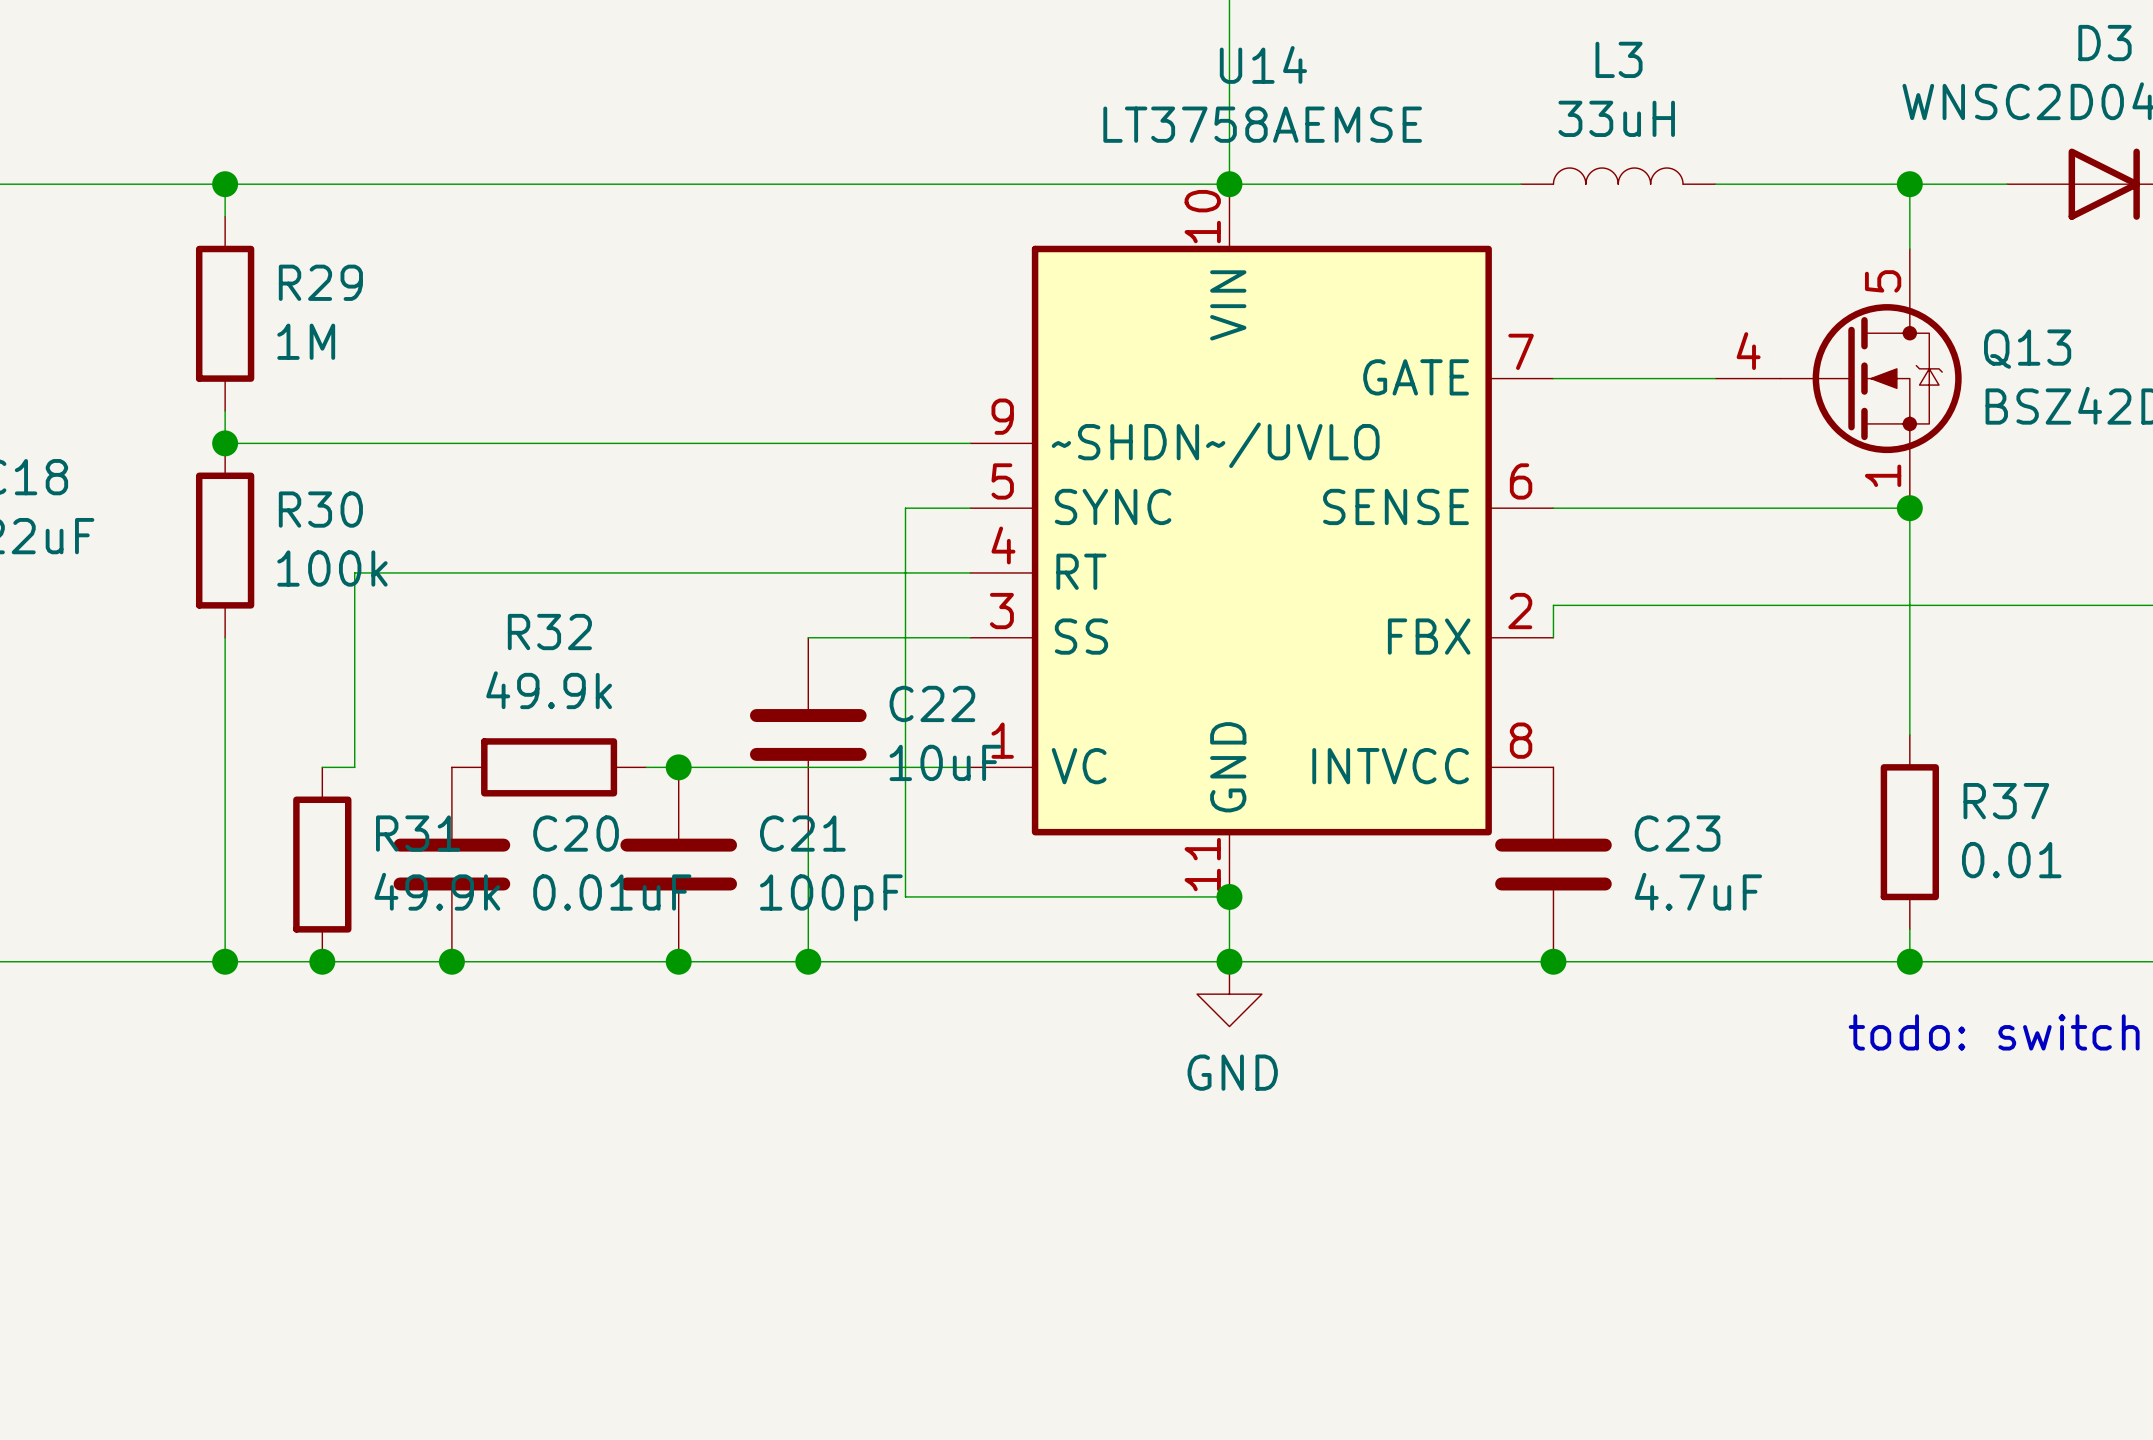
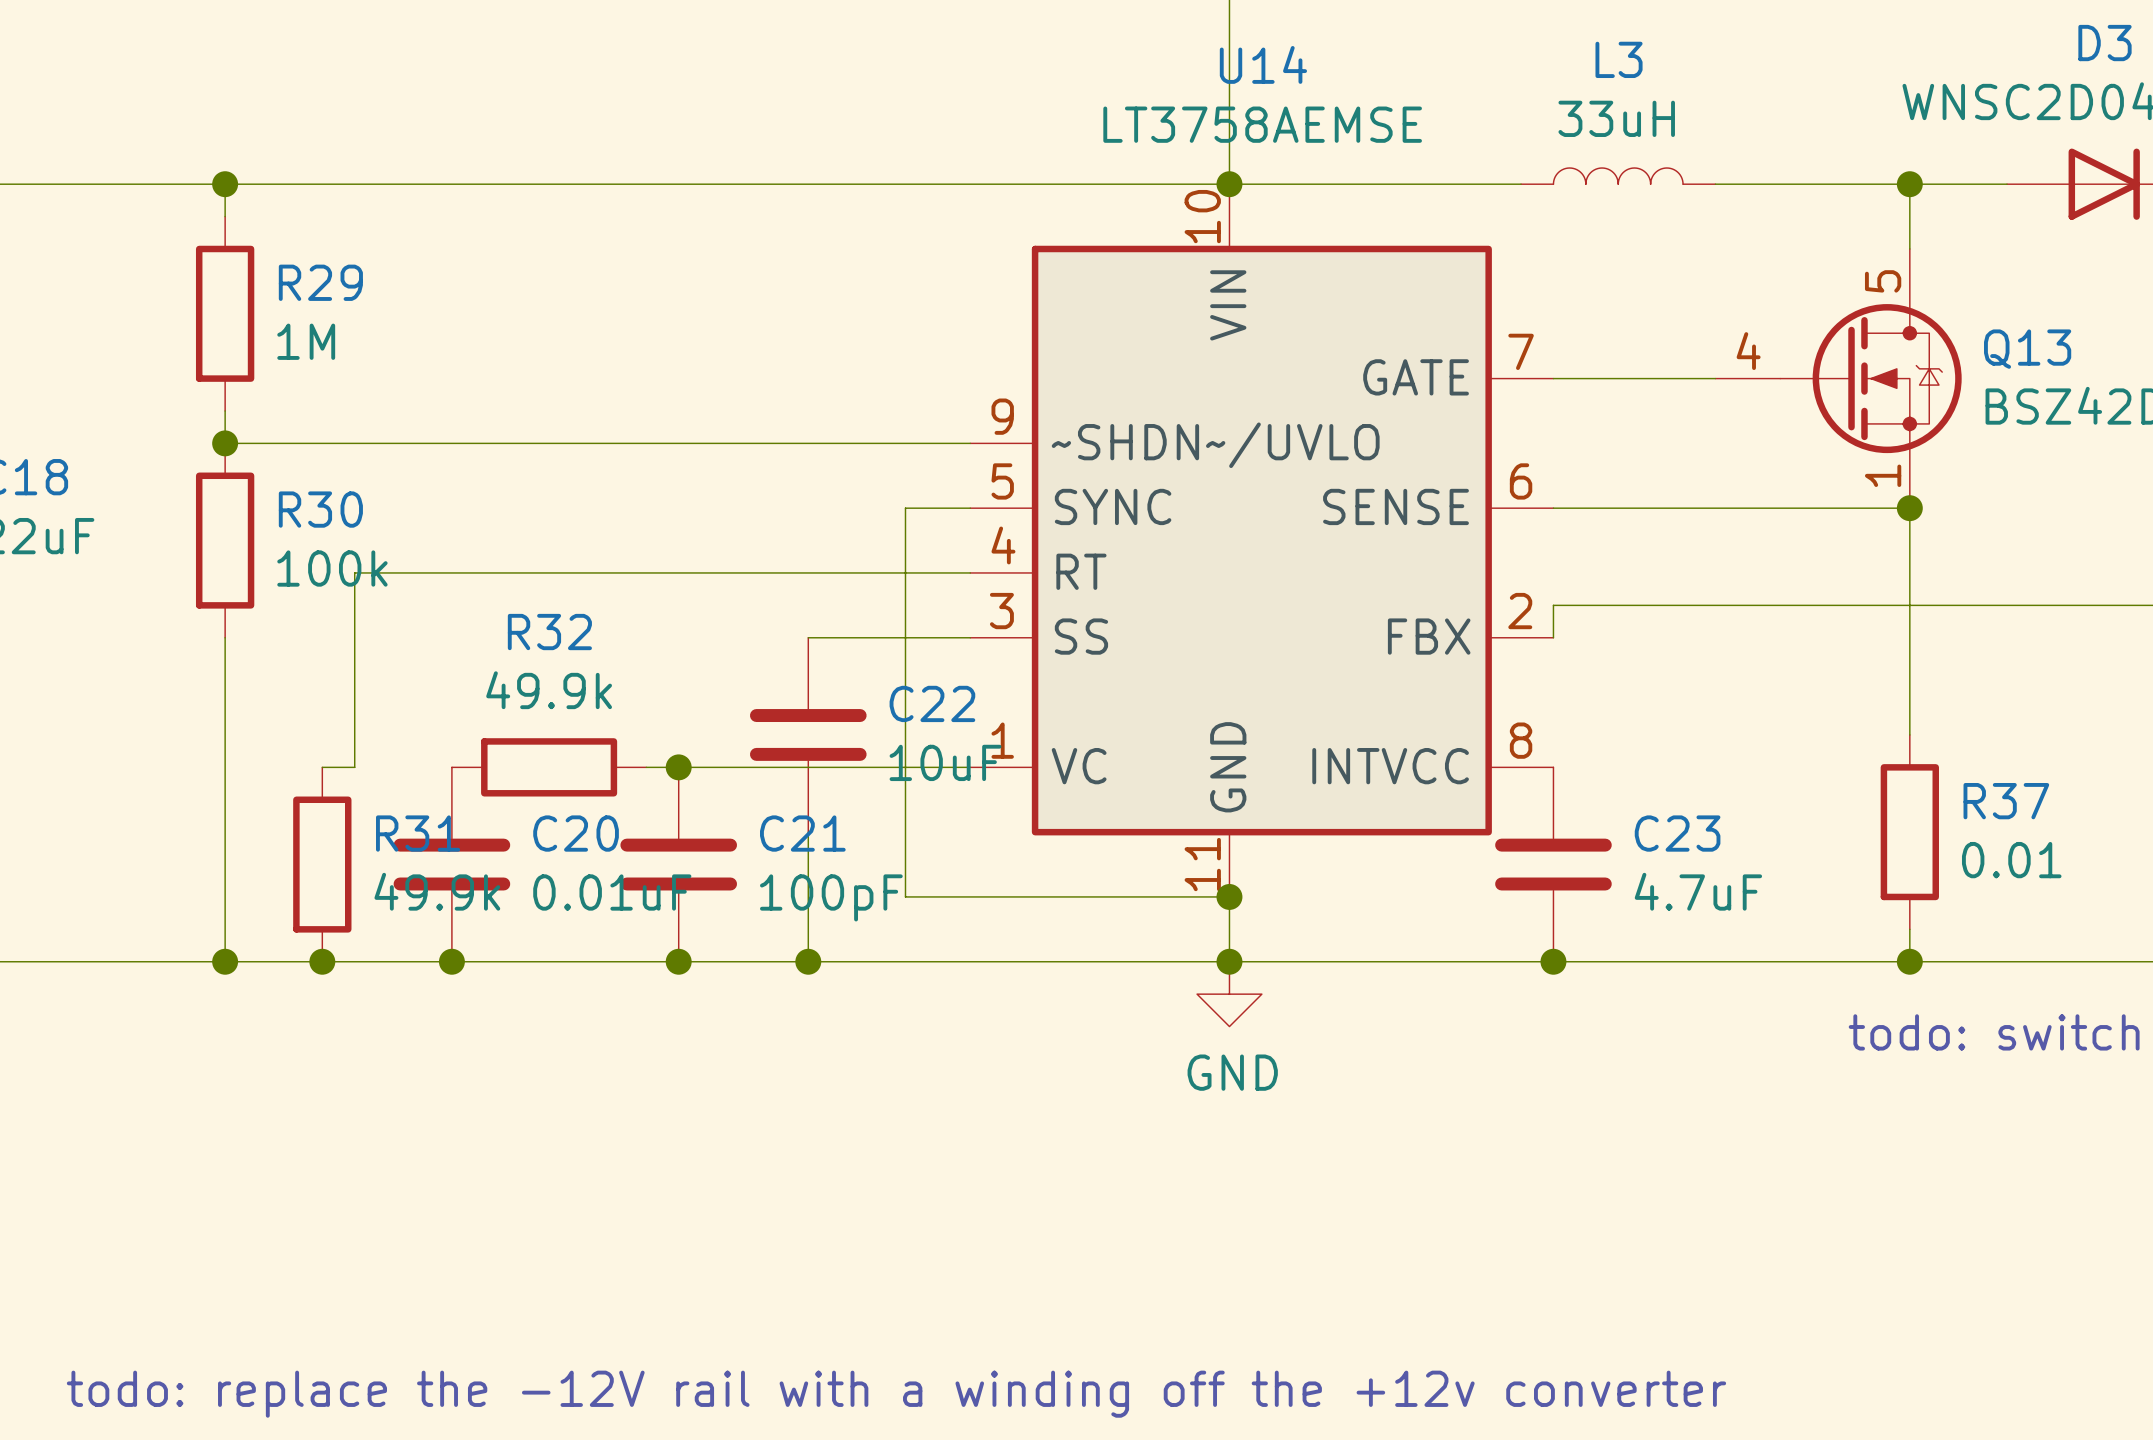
text: none -> todo: replace the -12V rail with a winding off the +12v converter (896, 1394)

